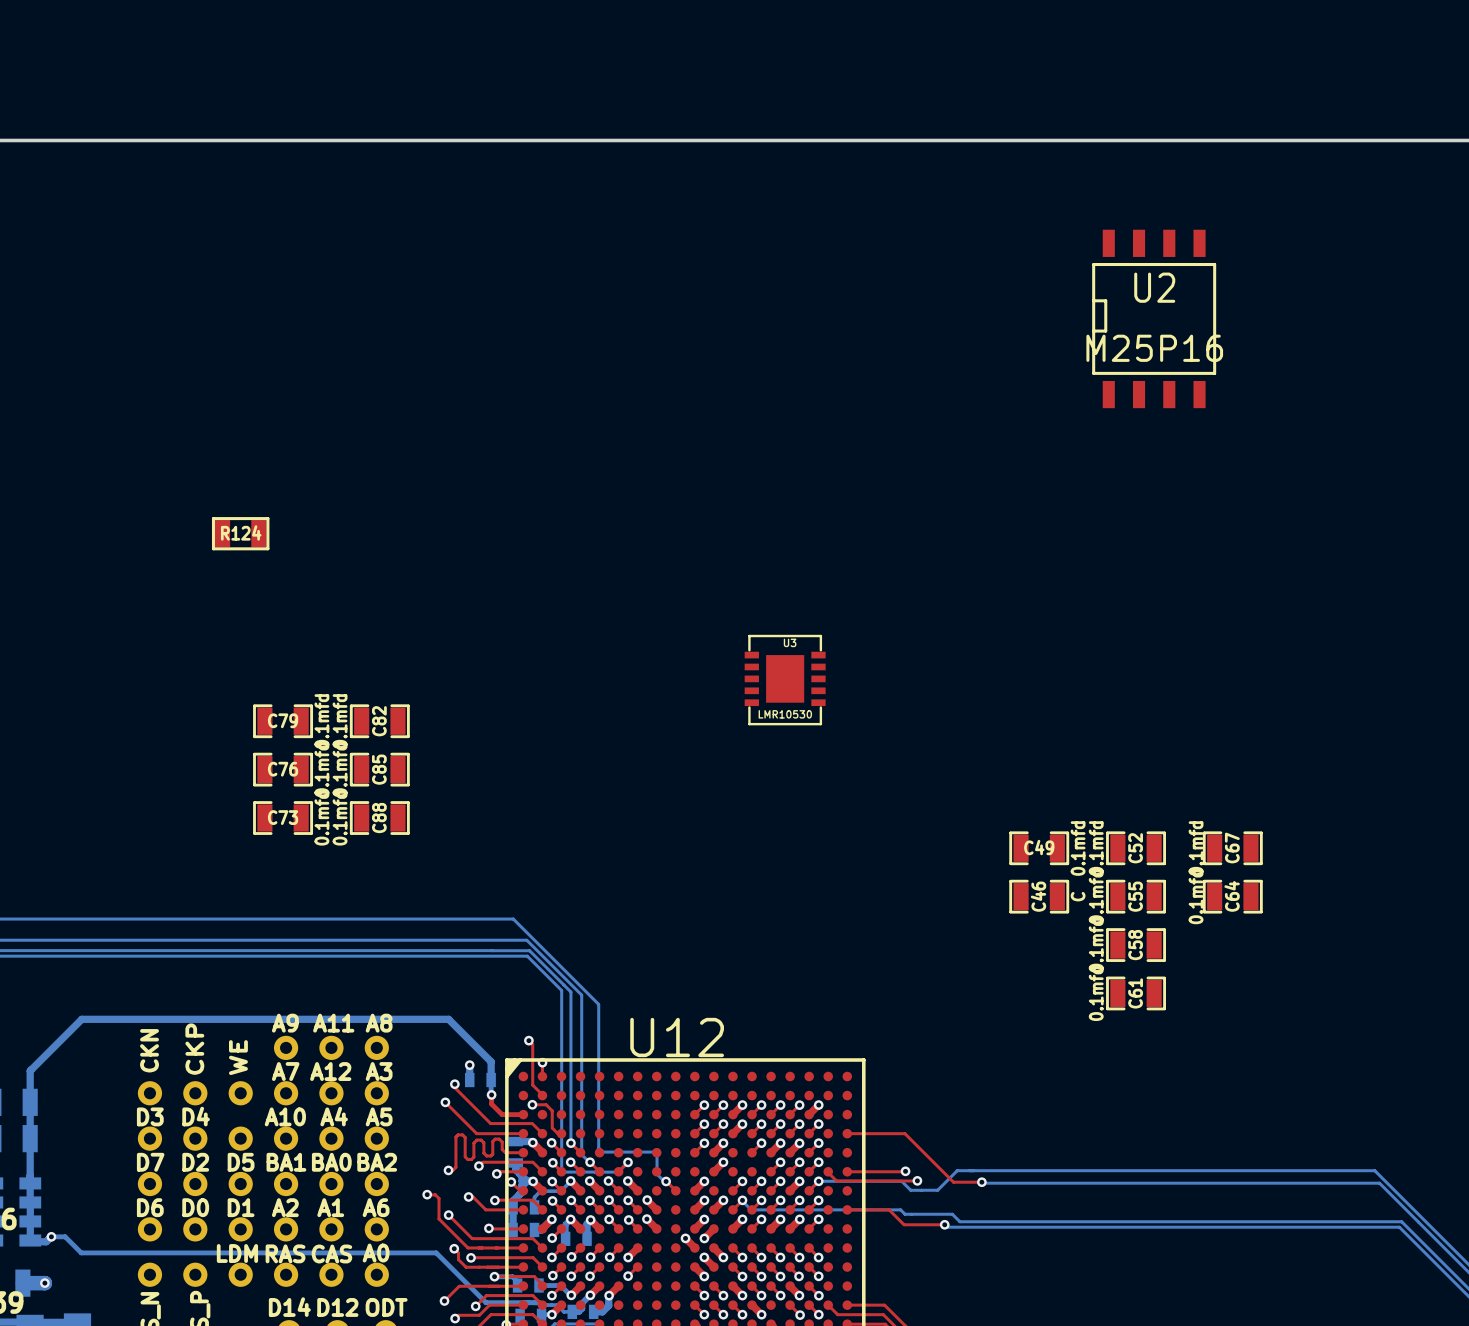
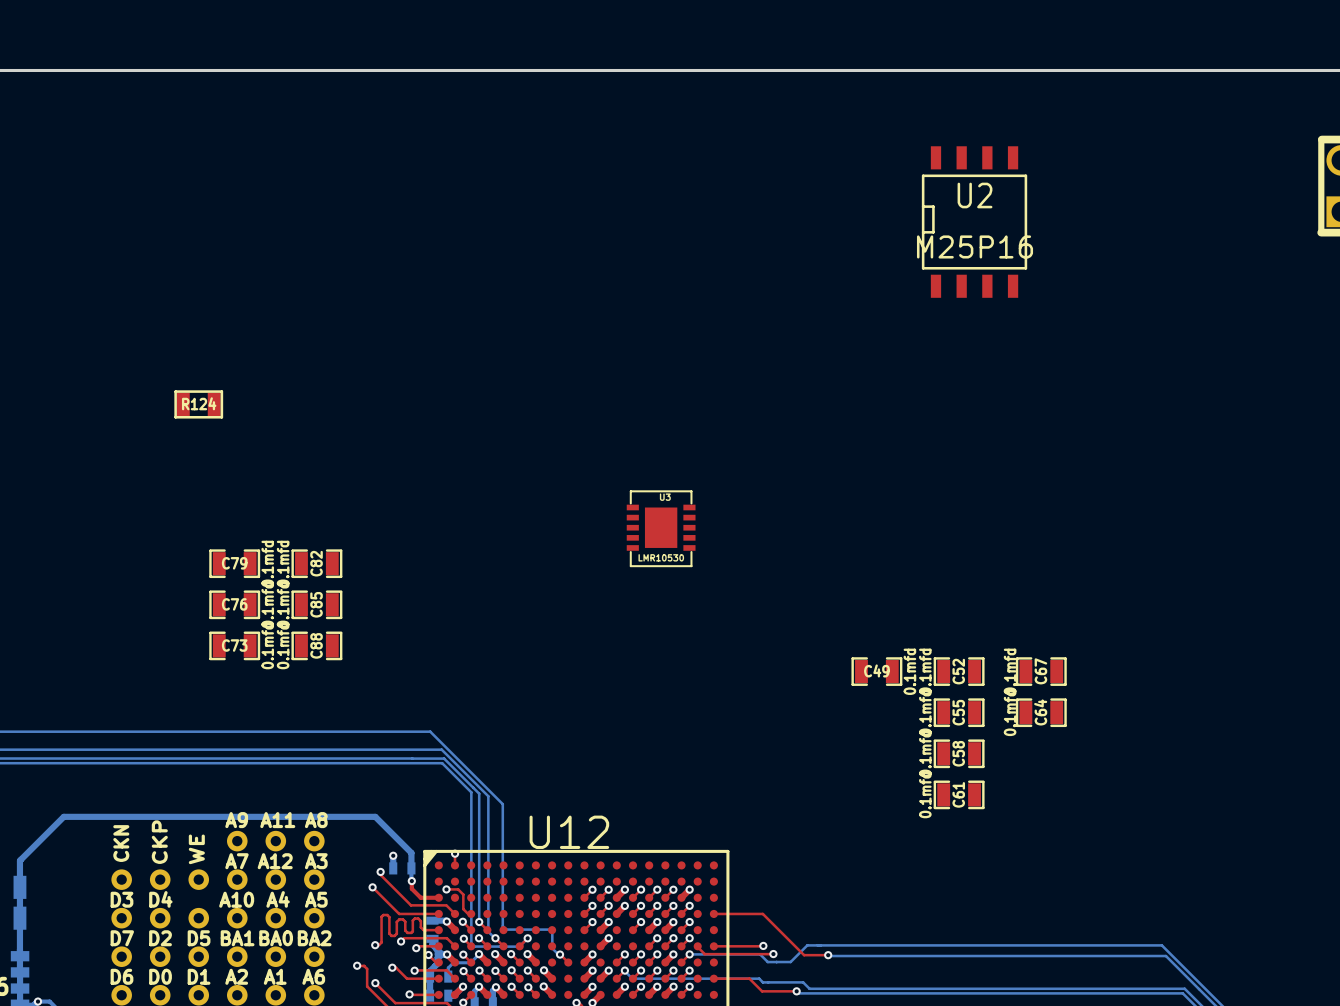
C46: C (1039, 896) -> none
top track: (528, 1040) (532, 1044) (532, 1085) (542, 1095) -> none
via: (528, 1040) -> none

